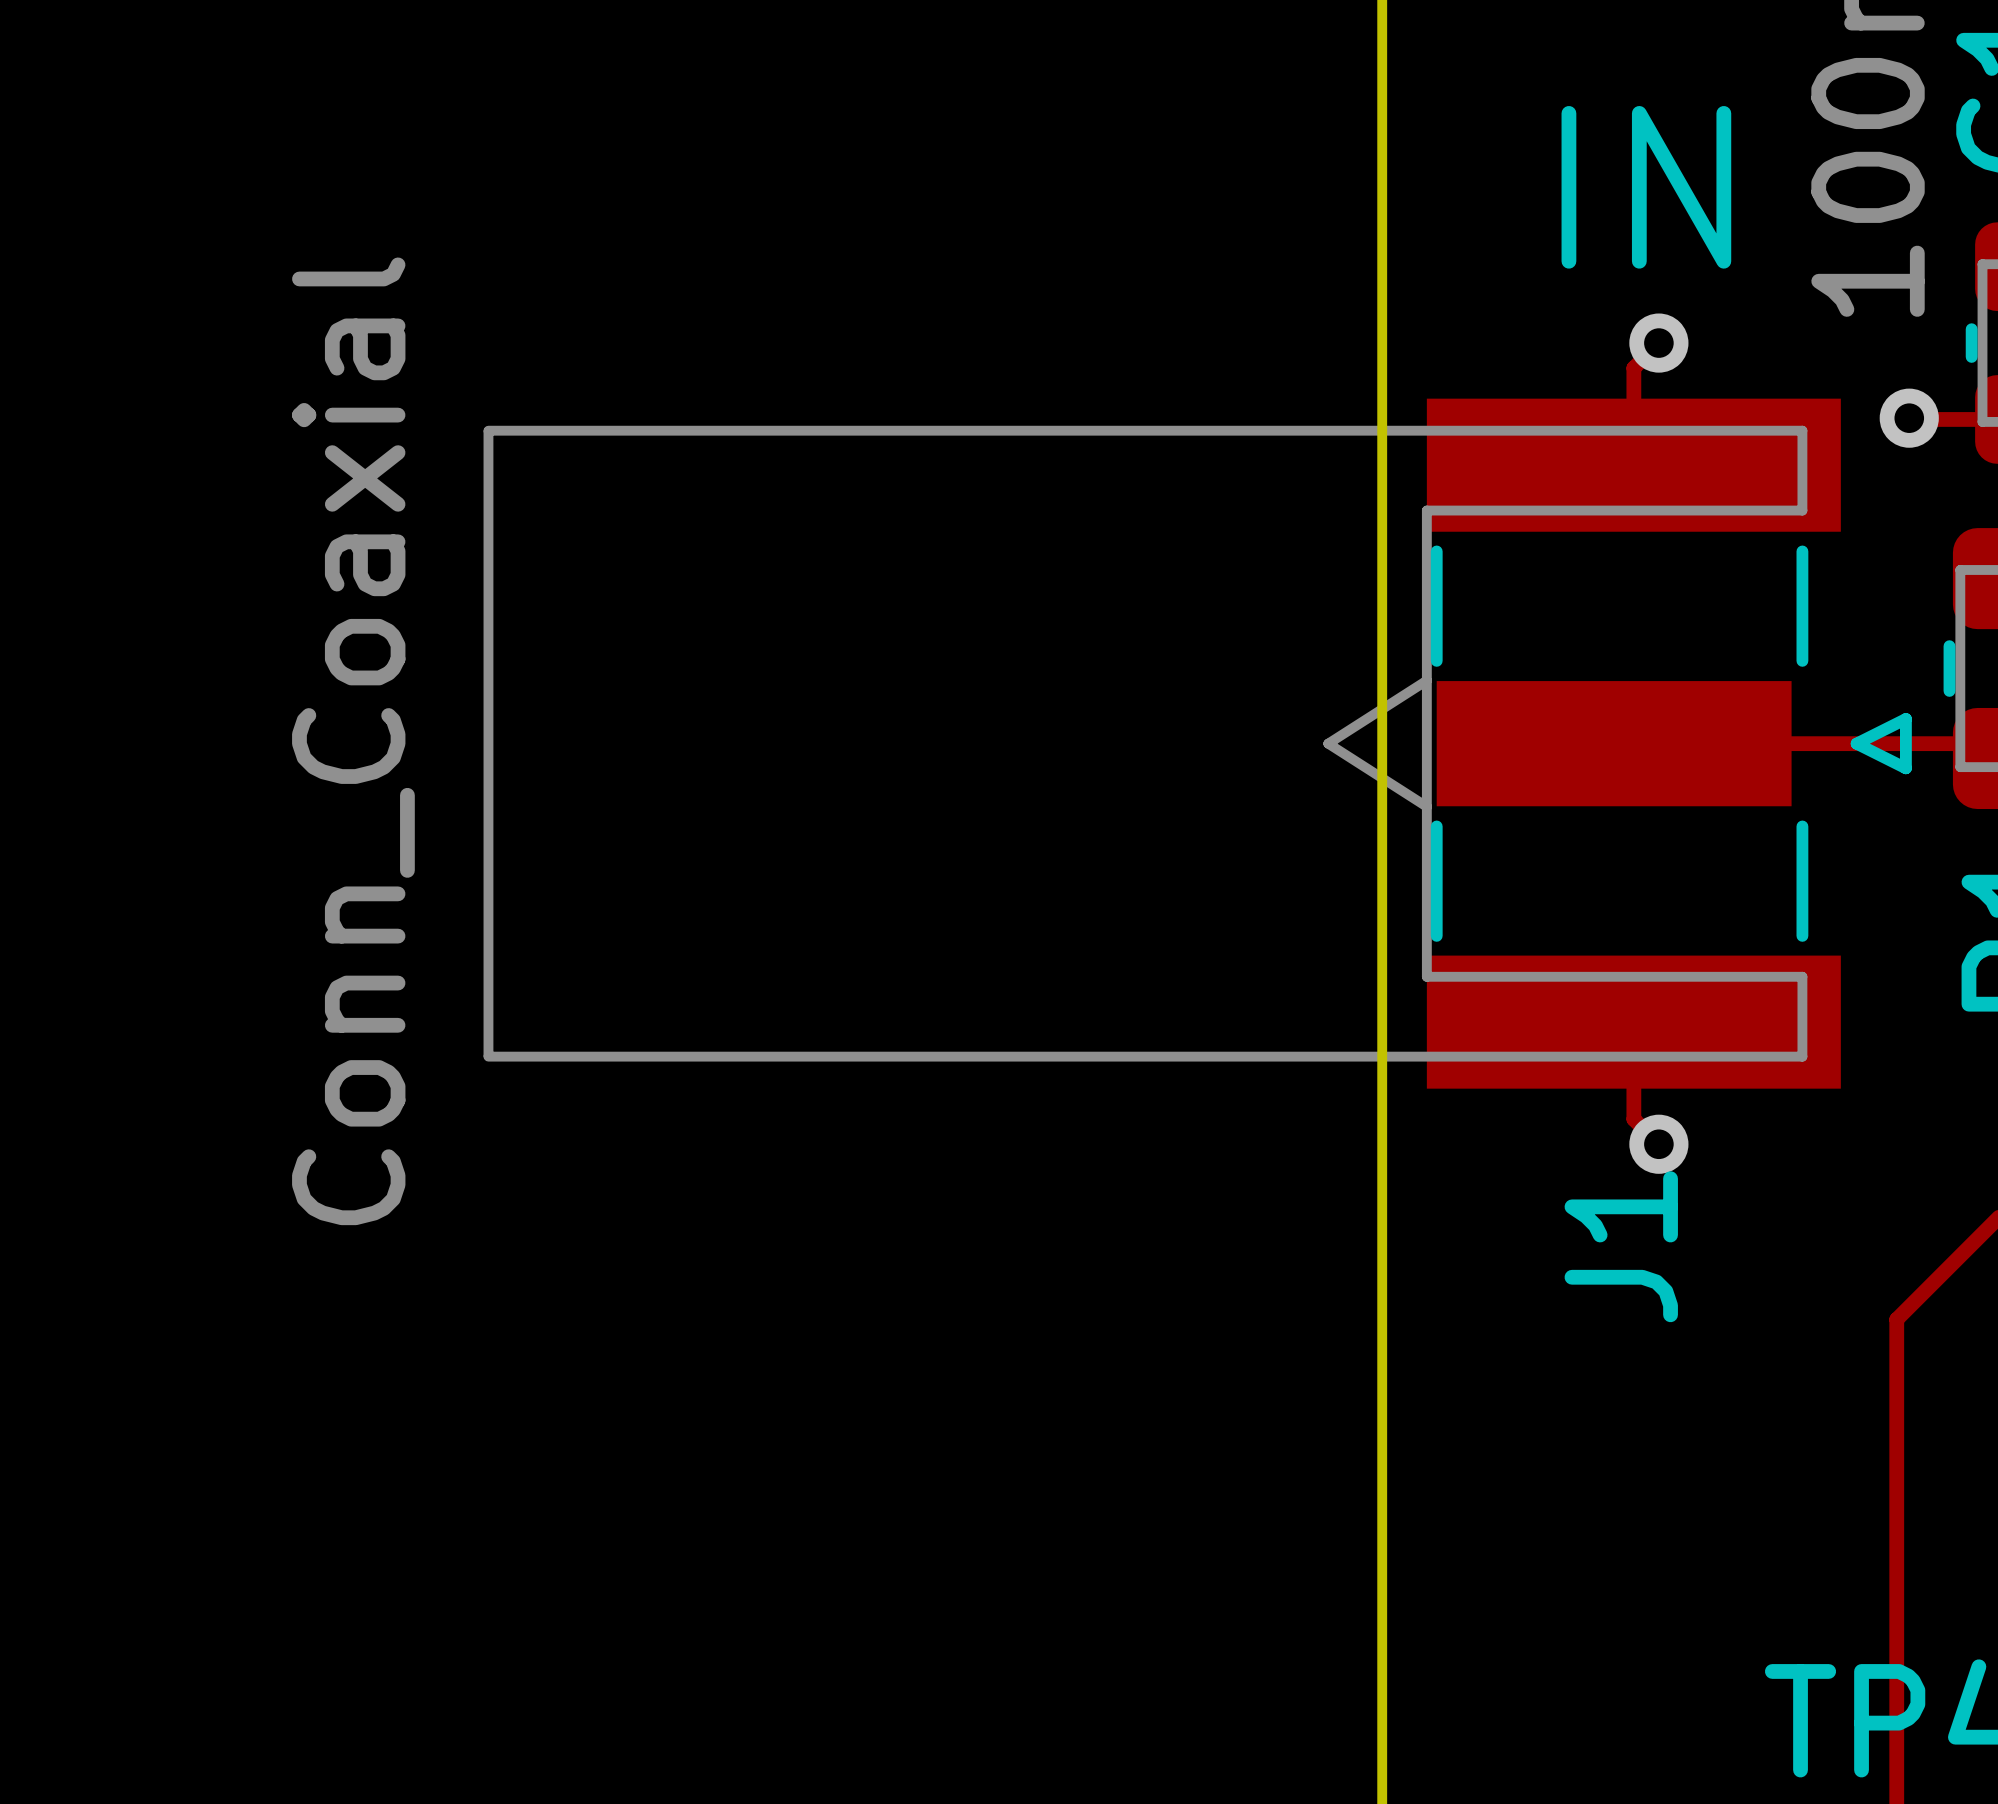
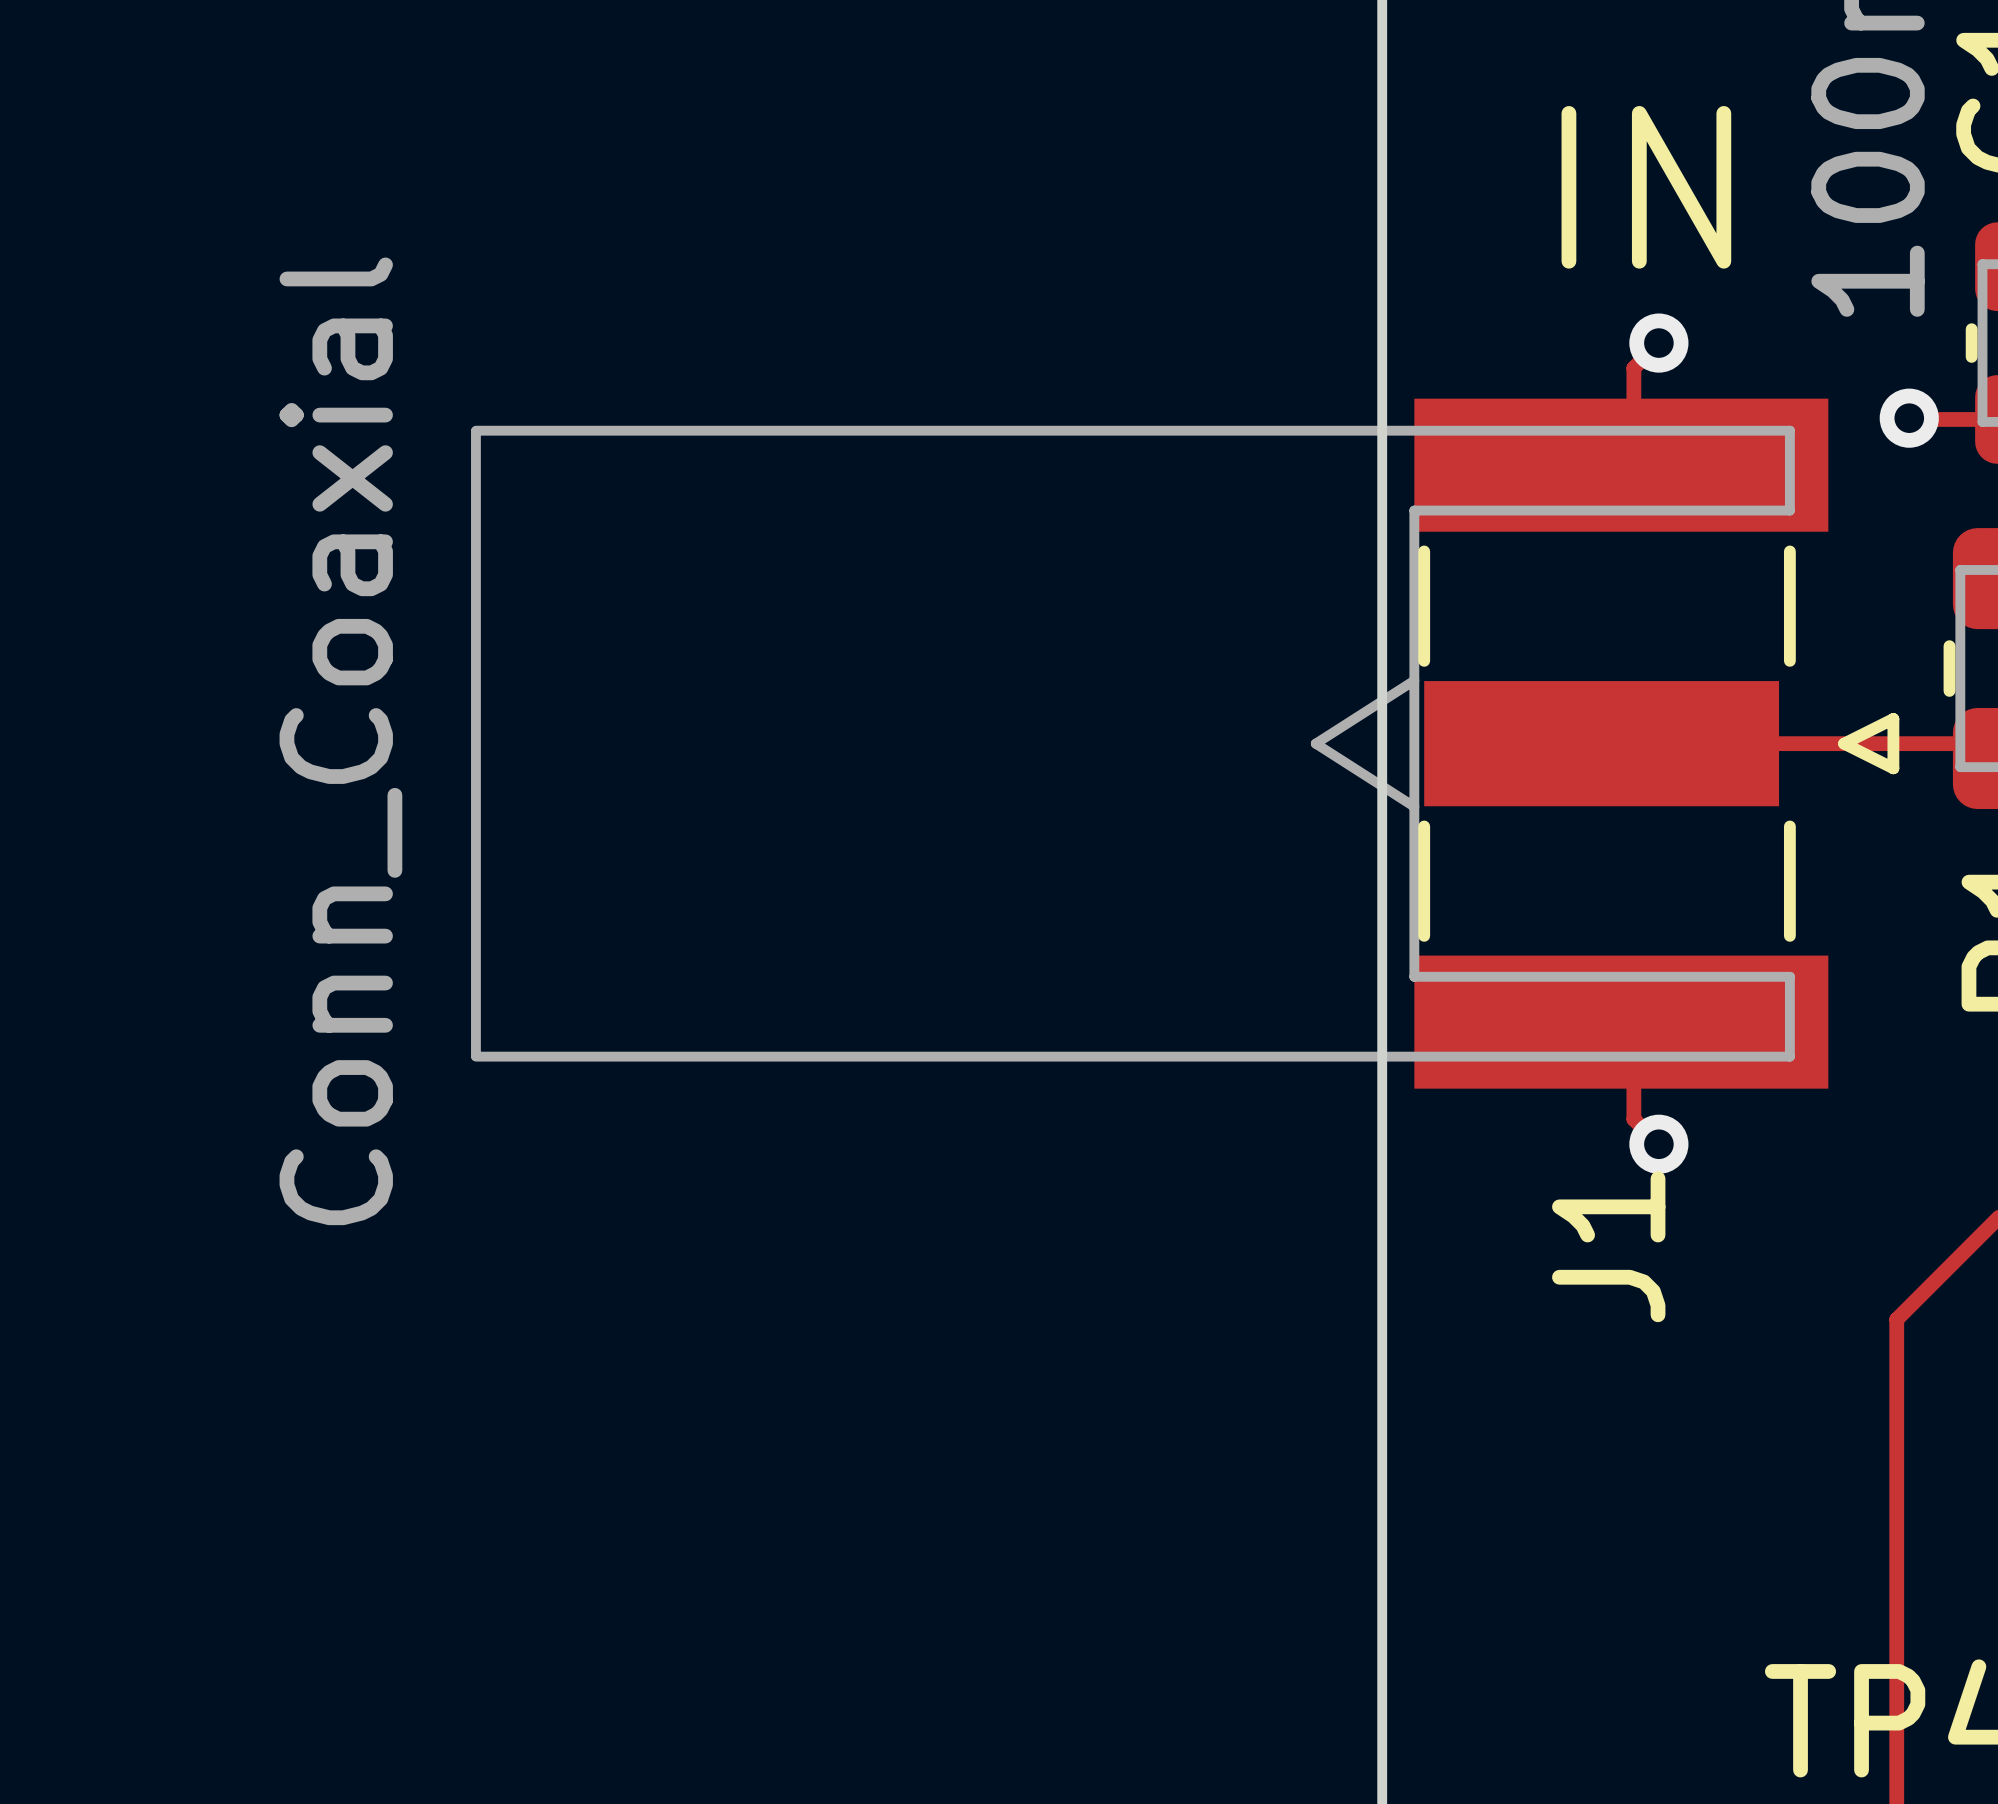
J1 position: (1197, 743) -> (1185, 743)

